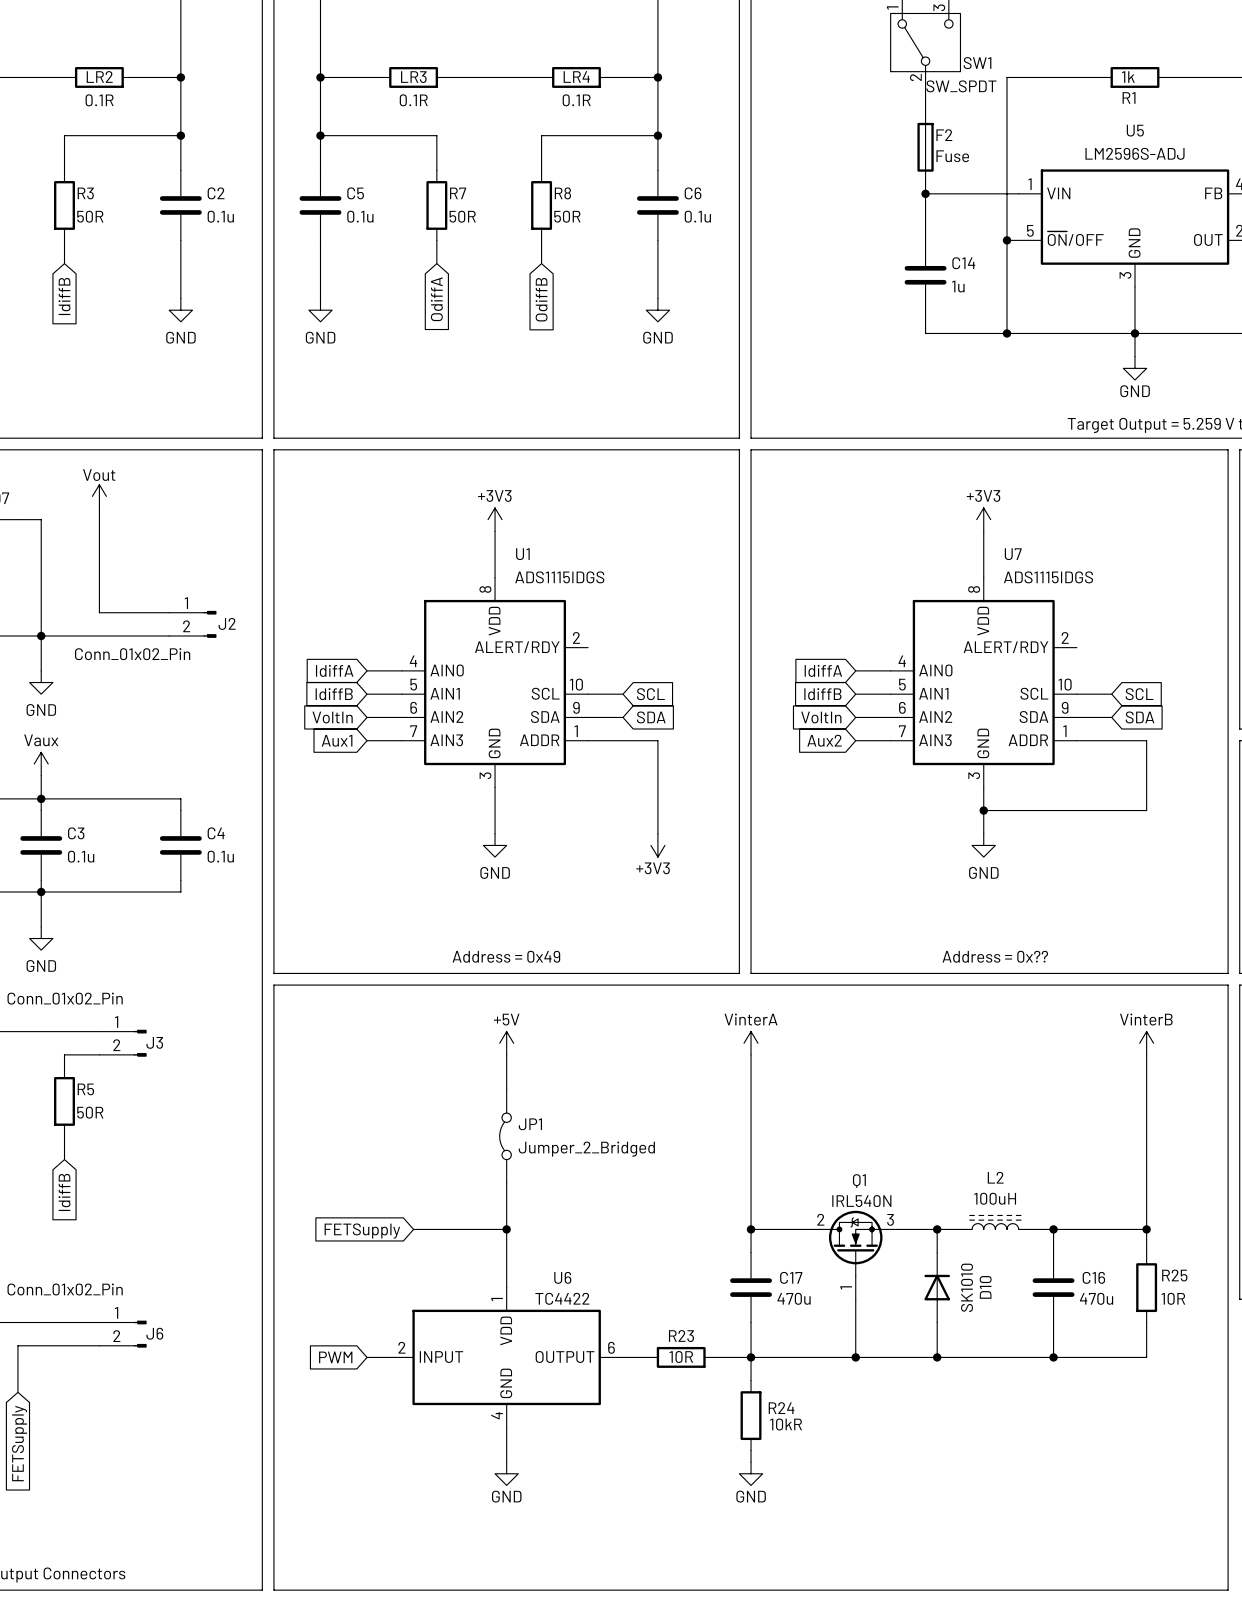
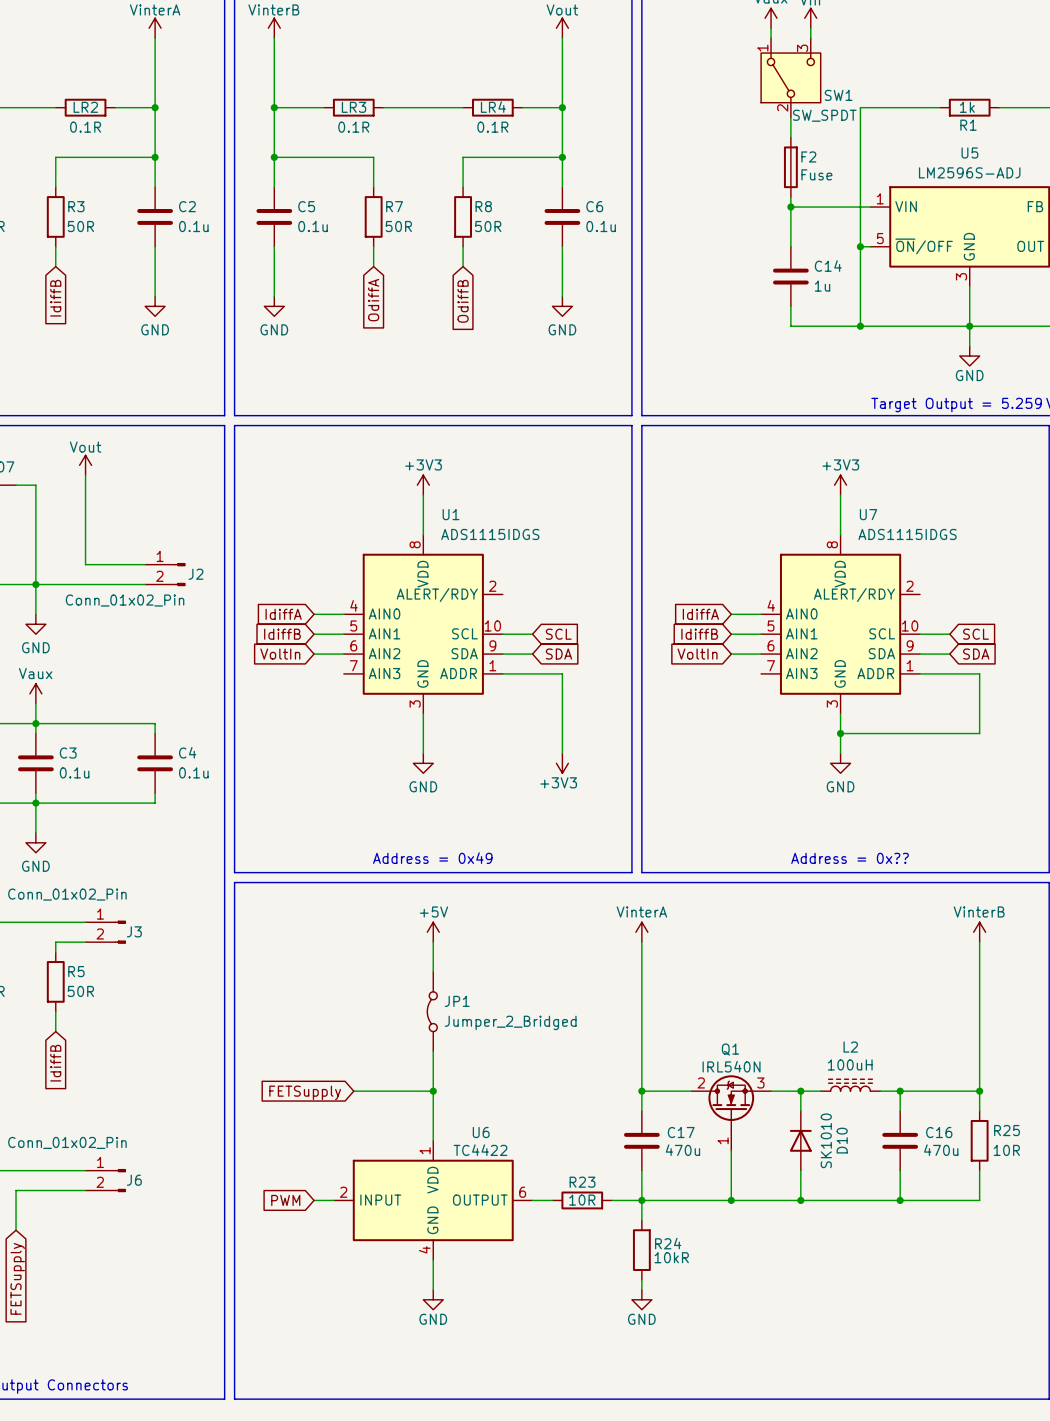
global label: Aux1 (337, 740) -> none
wire: (367, 740) (401, 740) -> none
global label: Aux2 (824, 740) -> none
wire: (855, 740) (890, 740) -> none

